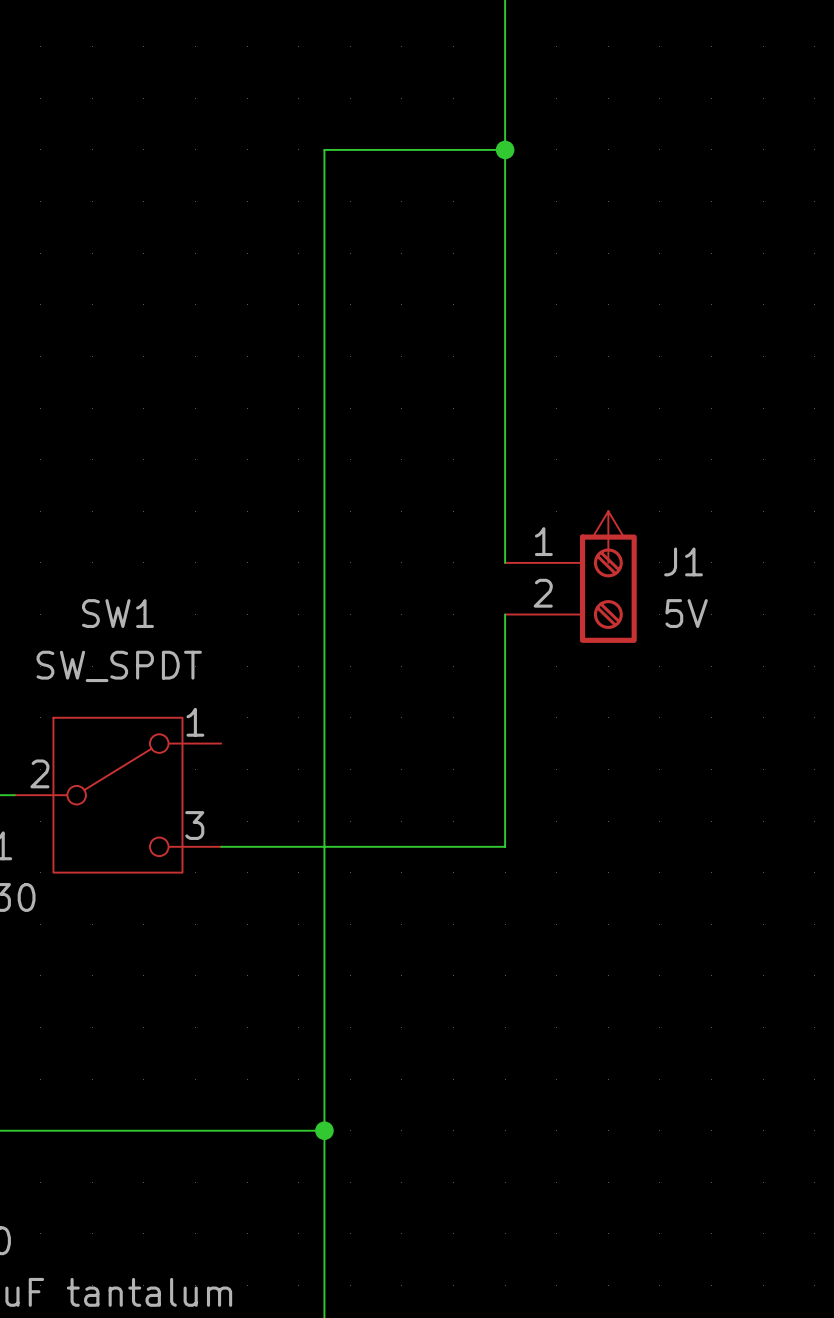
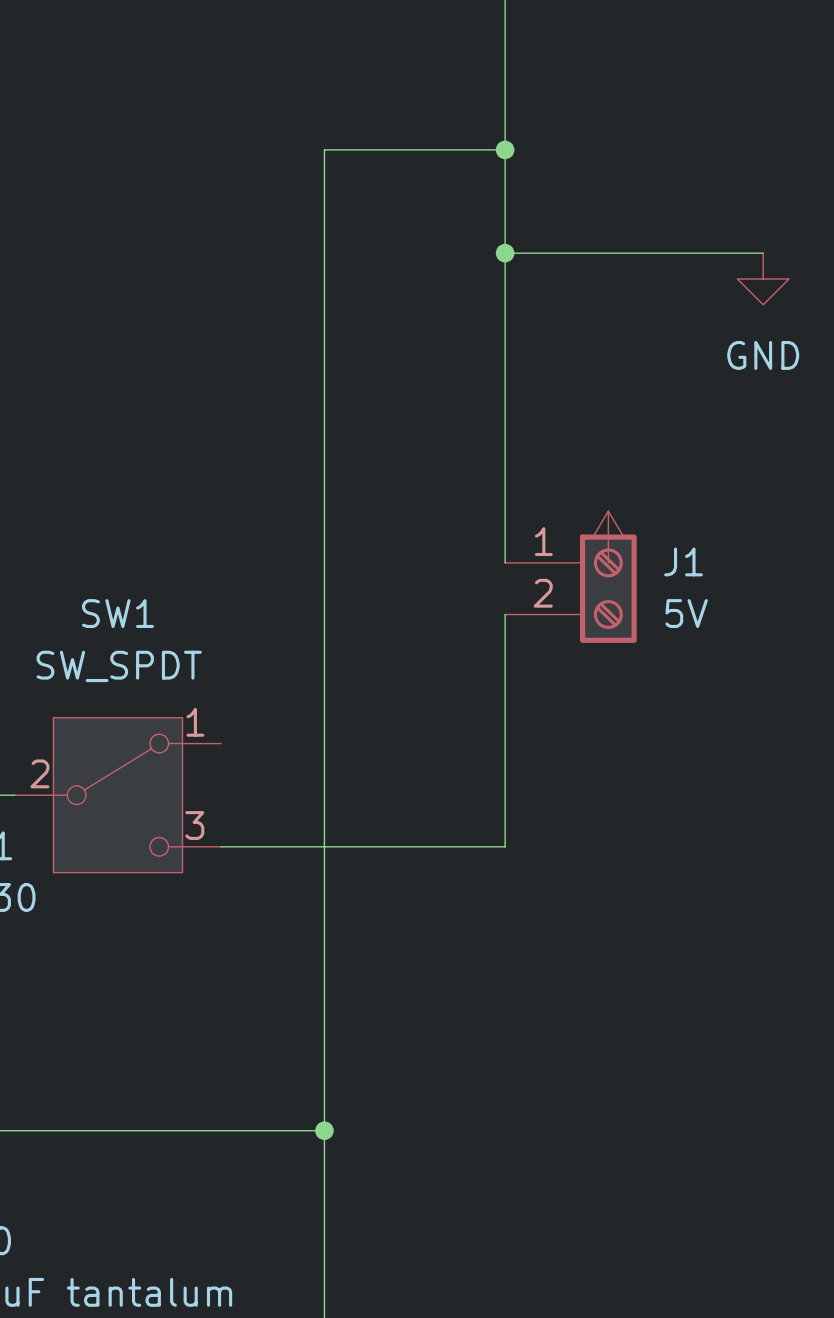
wire: none -> (505, 253) (763, 253)
junction: none -> (505, 253)
power symbol: none -> GND (763, 278)

